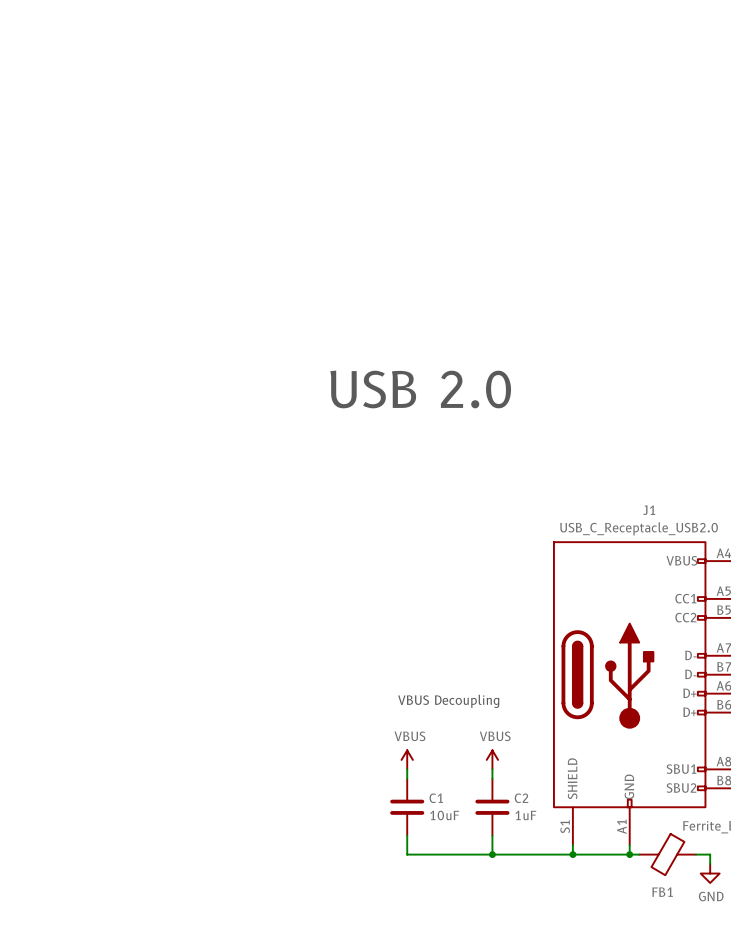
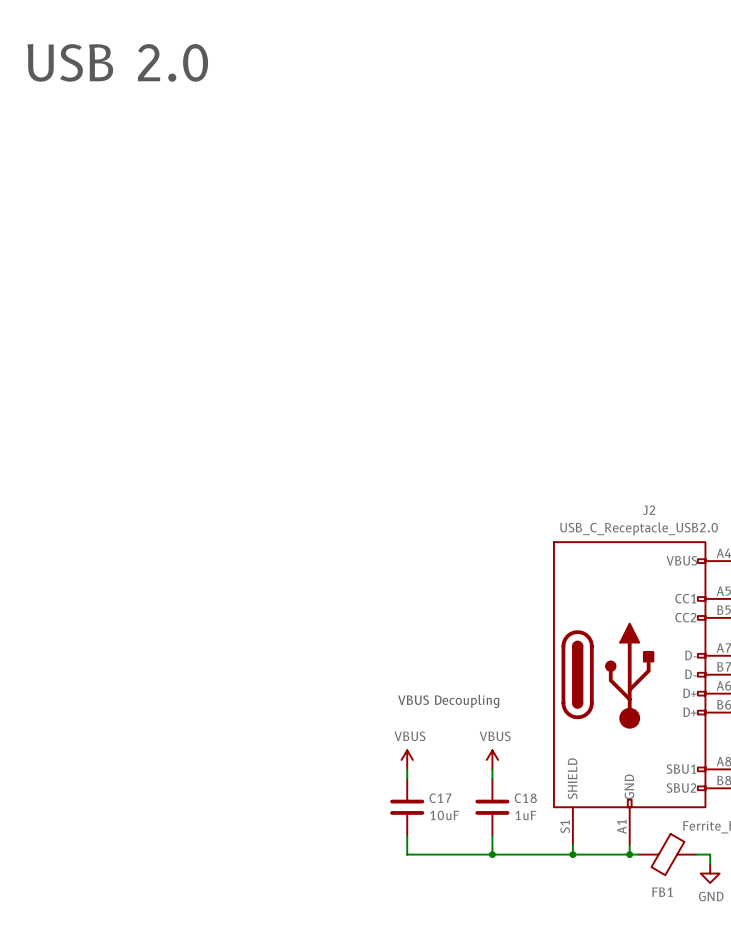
text: none -> USB 2.0 (117, 62)
text: USB 2.0 (420, 389) -> none
J1 name: J1 (649, 510) -> J2 (649, 510)
C1 name: C1 (436, 798) -> C17 (440, 798)
C2 name: C2 (521, 798) -> C18 (525, 798)

